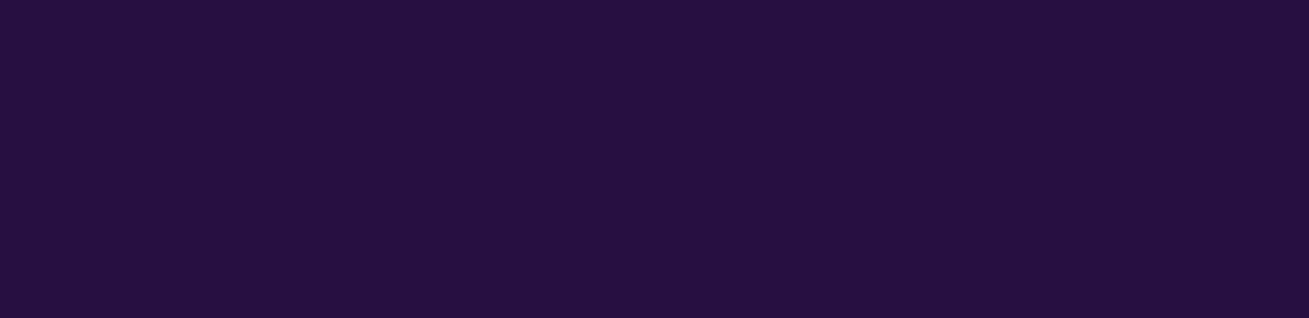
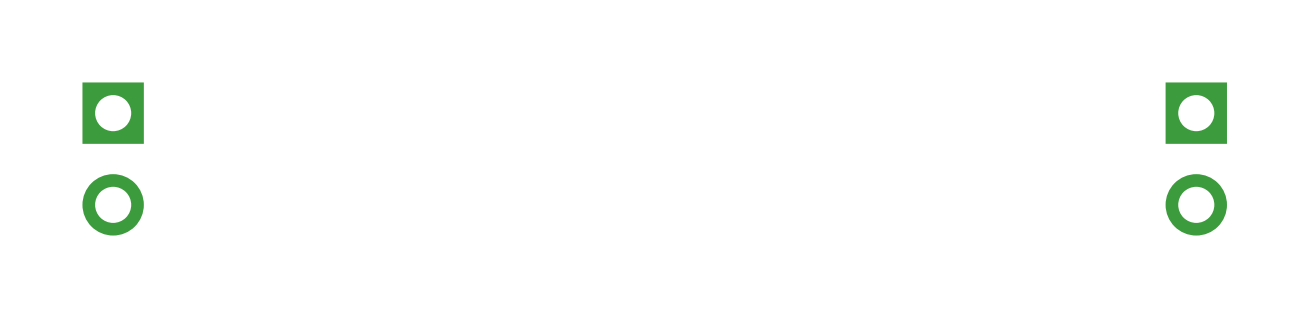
part: none -> (113, 159)
part: none -> (1196, 159)

